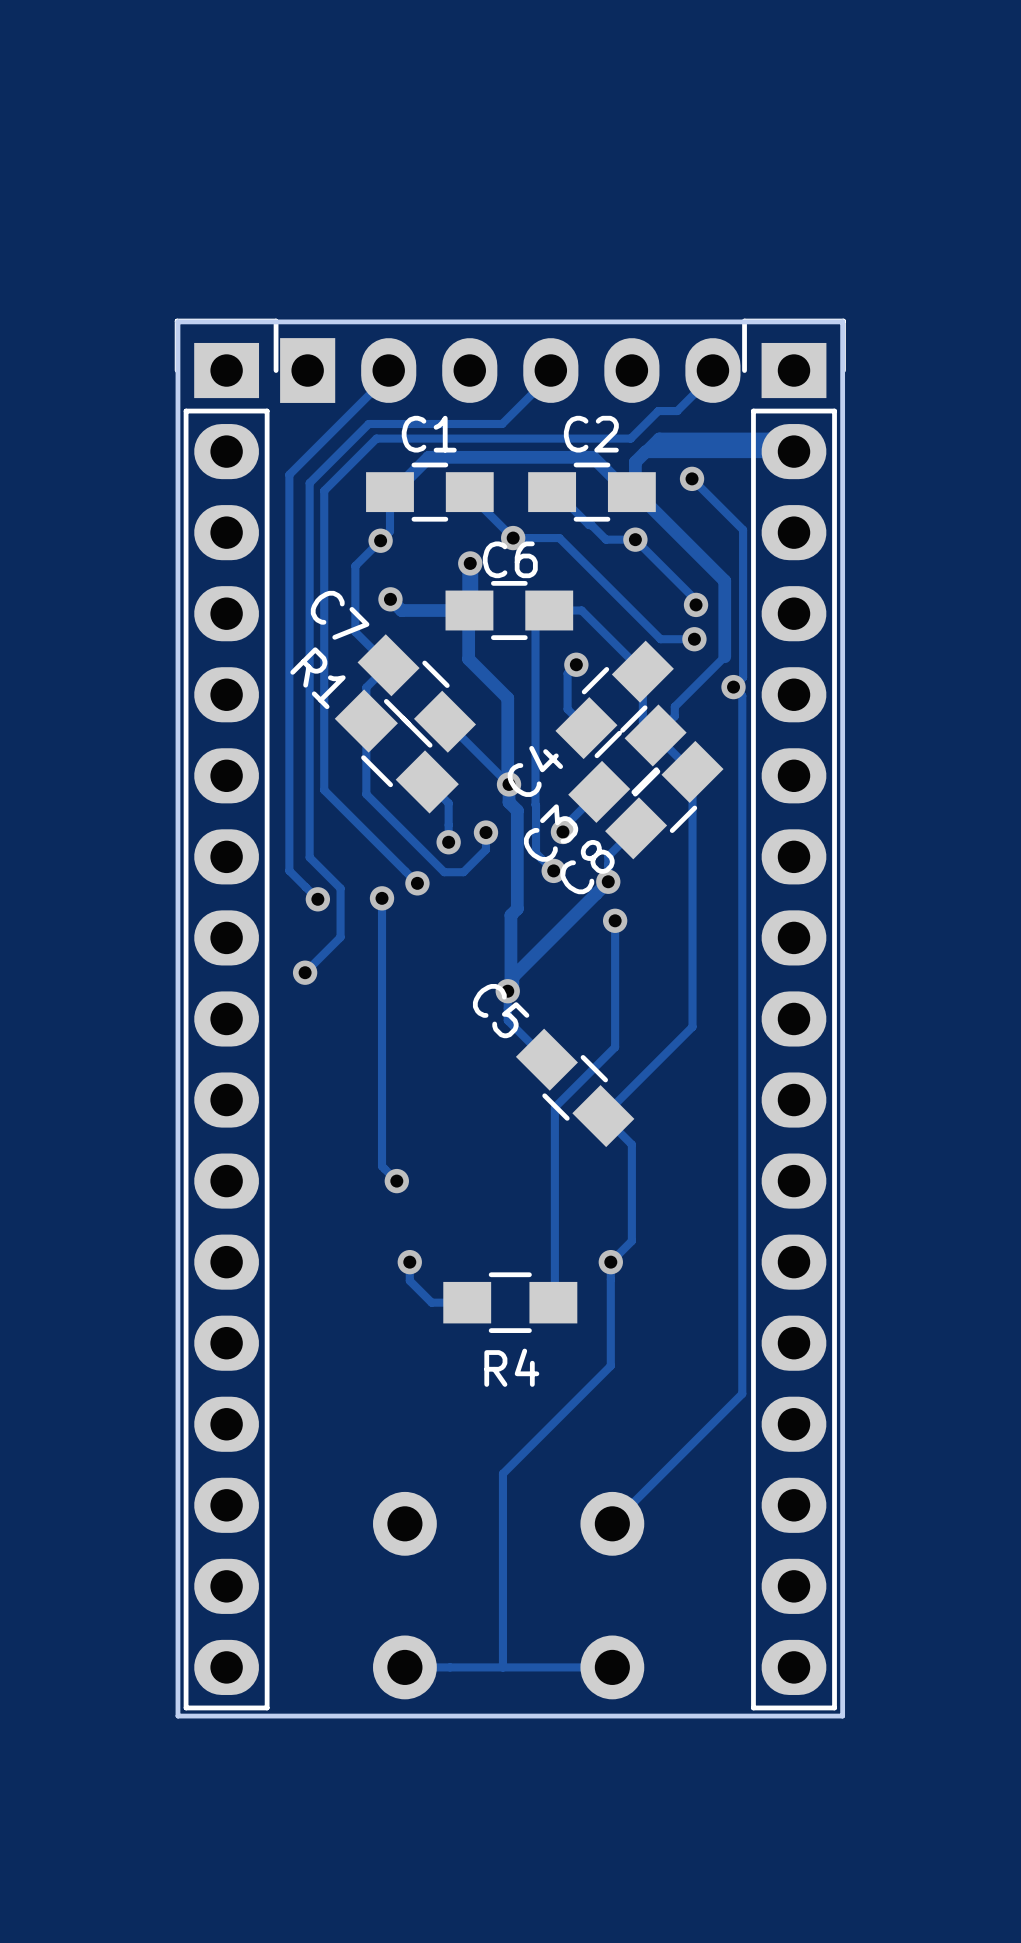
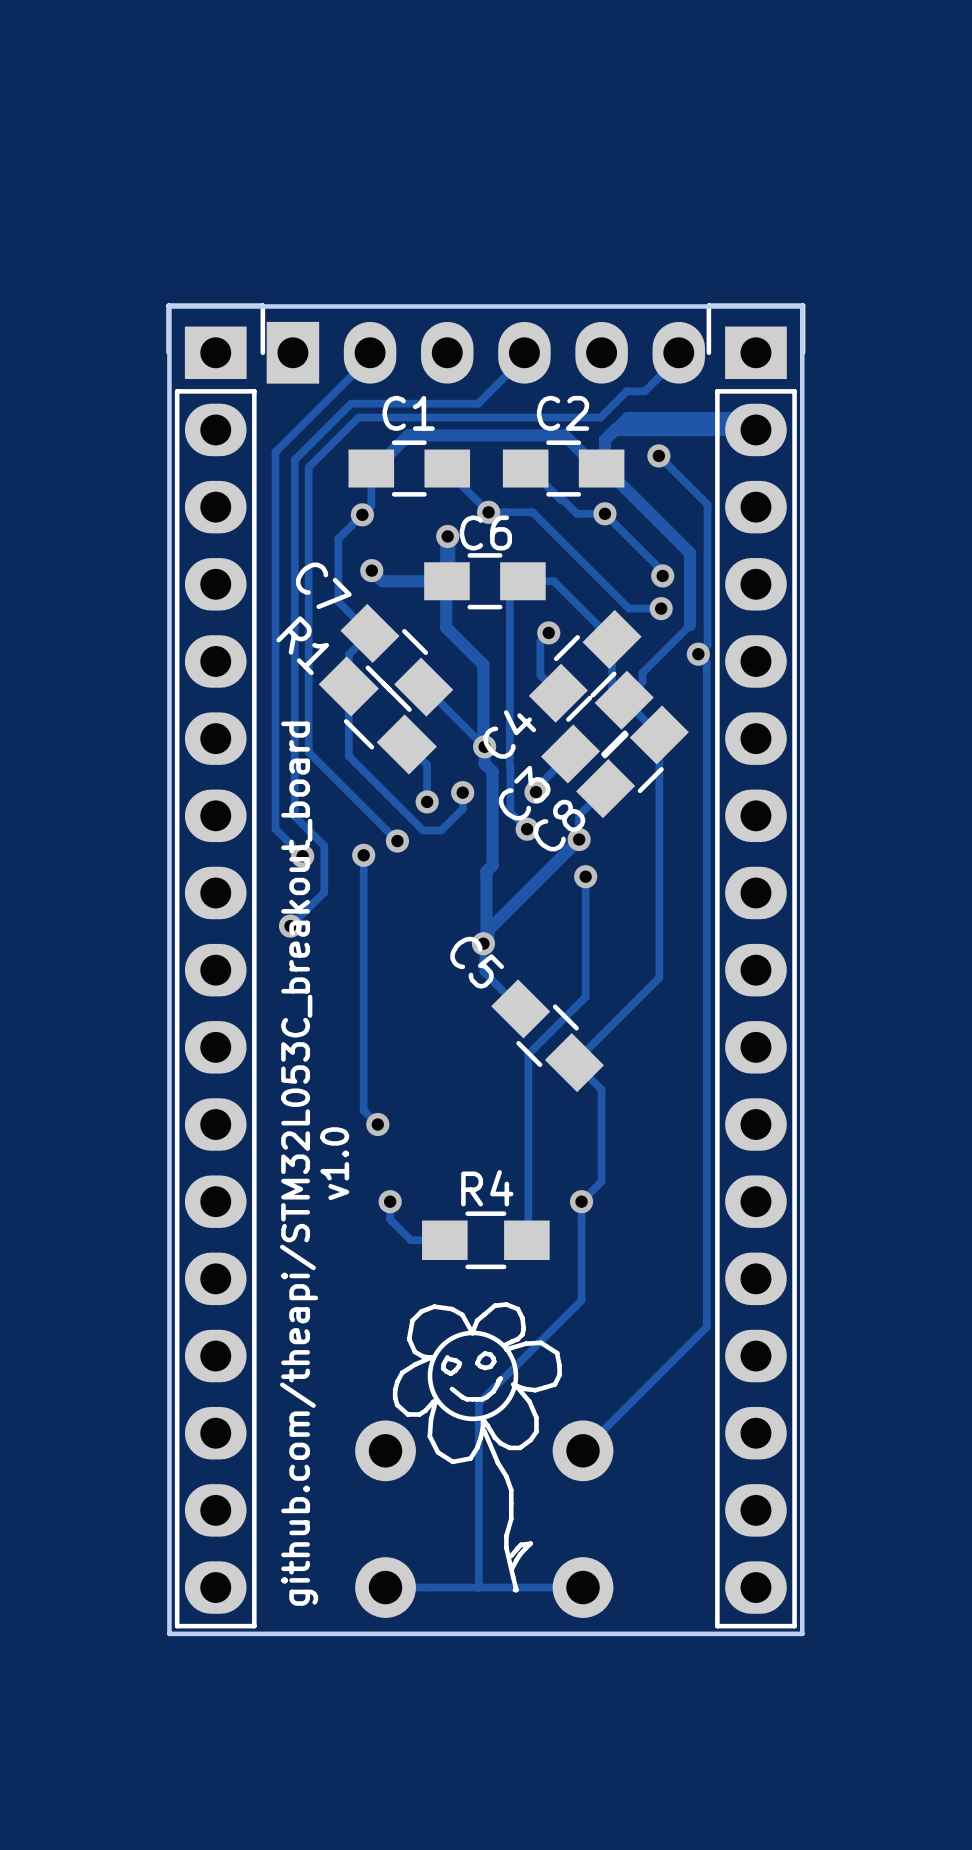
text: none -> github.com/theapi/STM32L053C_breakout_board (299, 1163)
text: none -> v1.0 (334, 1163)
drawing: none -> [392, 1302, 562, 1593]
R4 name position: R4 (511, 1367) -> R4 (487, 1188)

